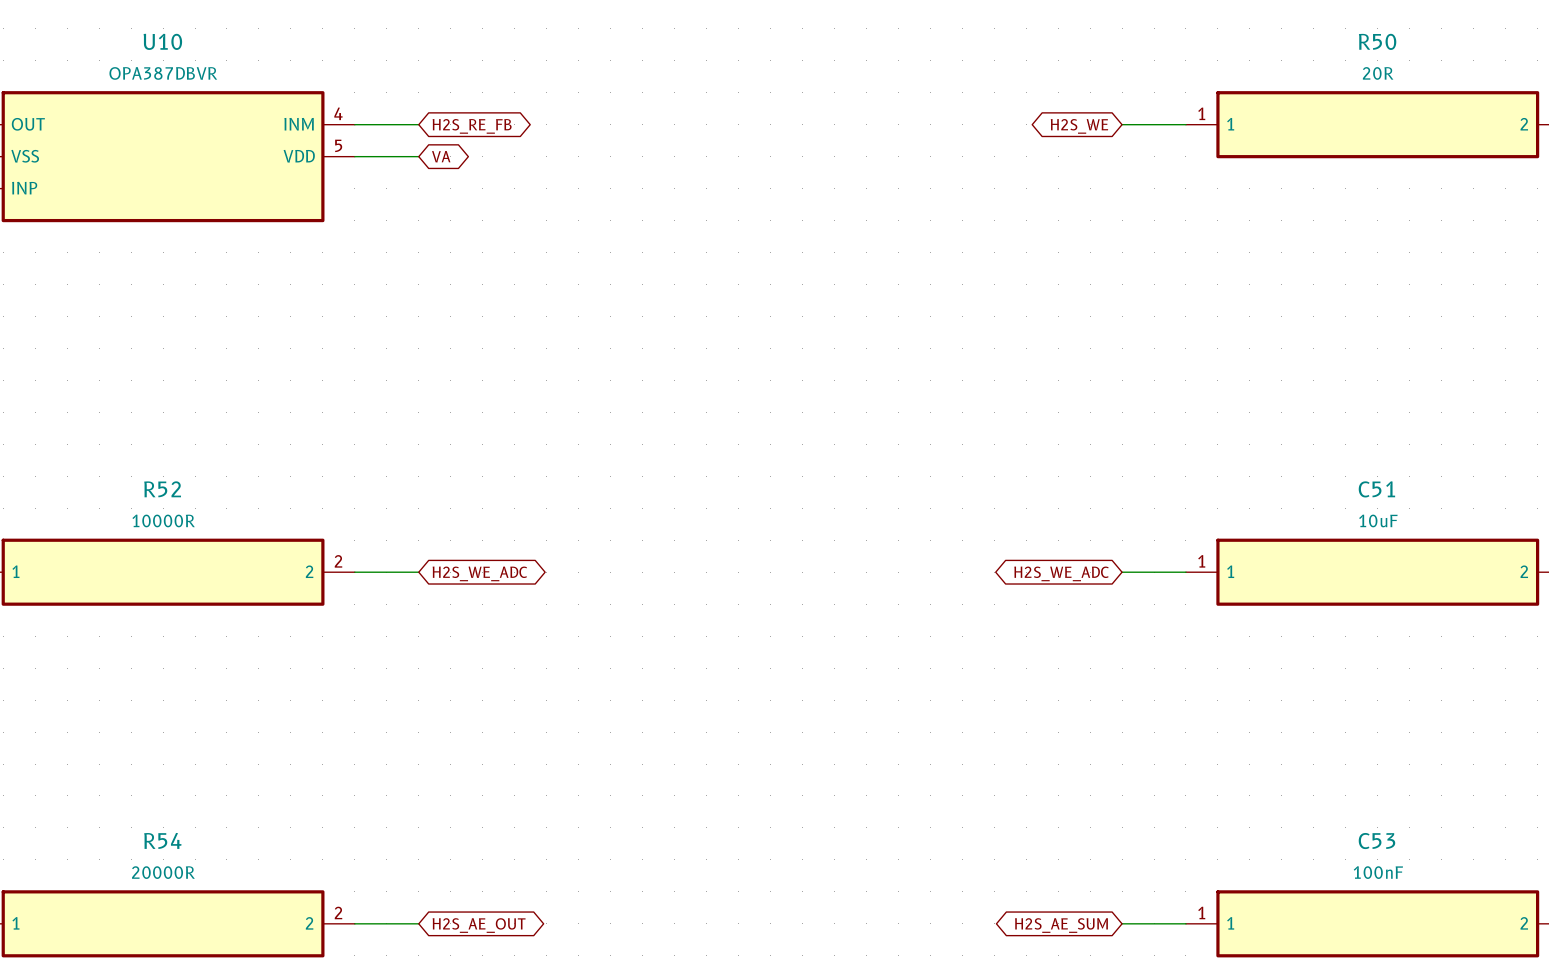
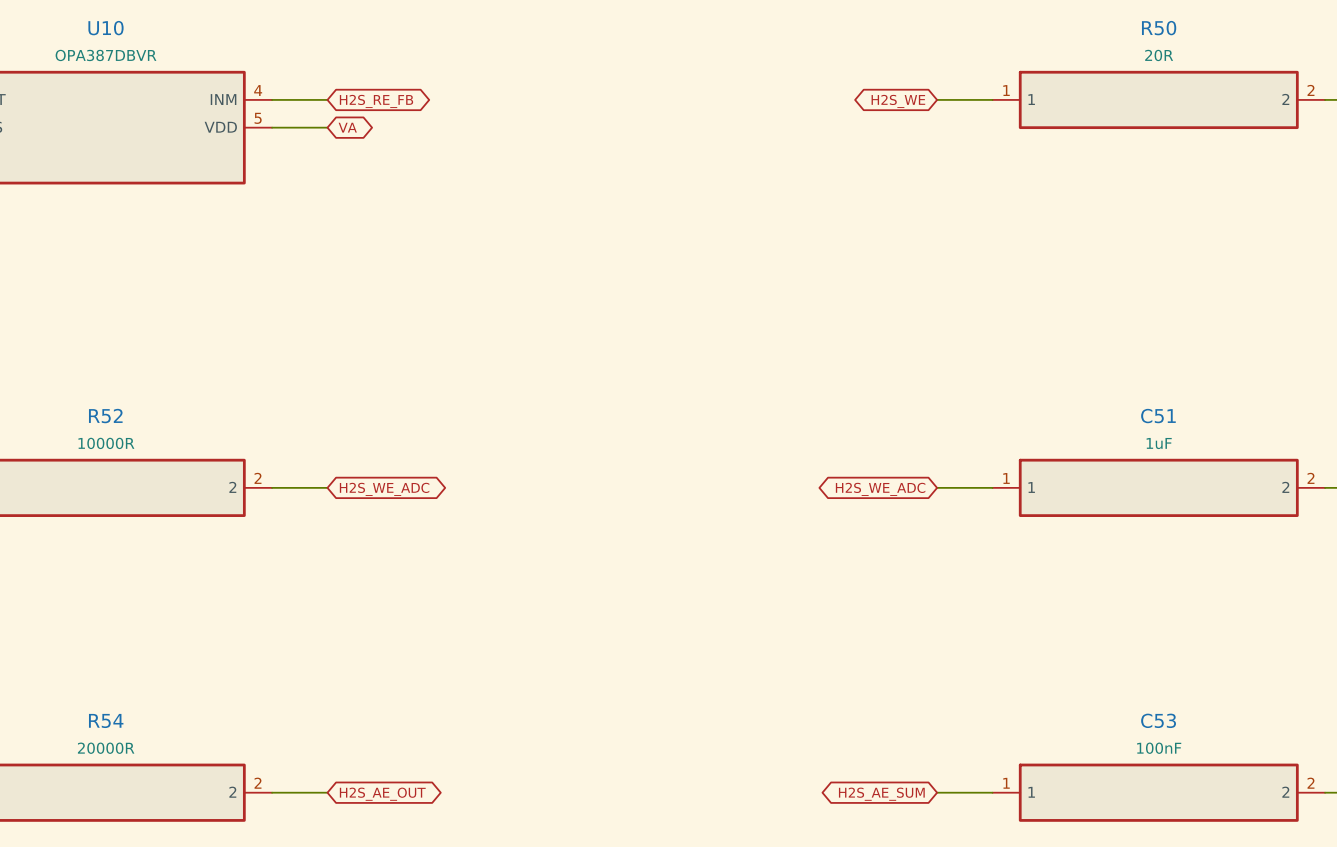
C51 value: 10uF (1378, 520) -> 1uF (1159, 443)

